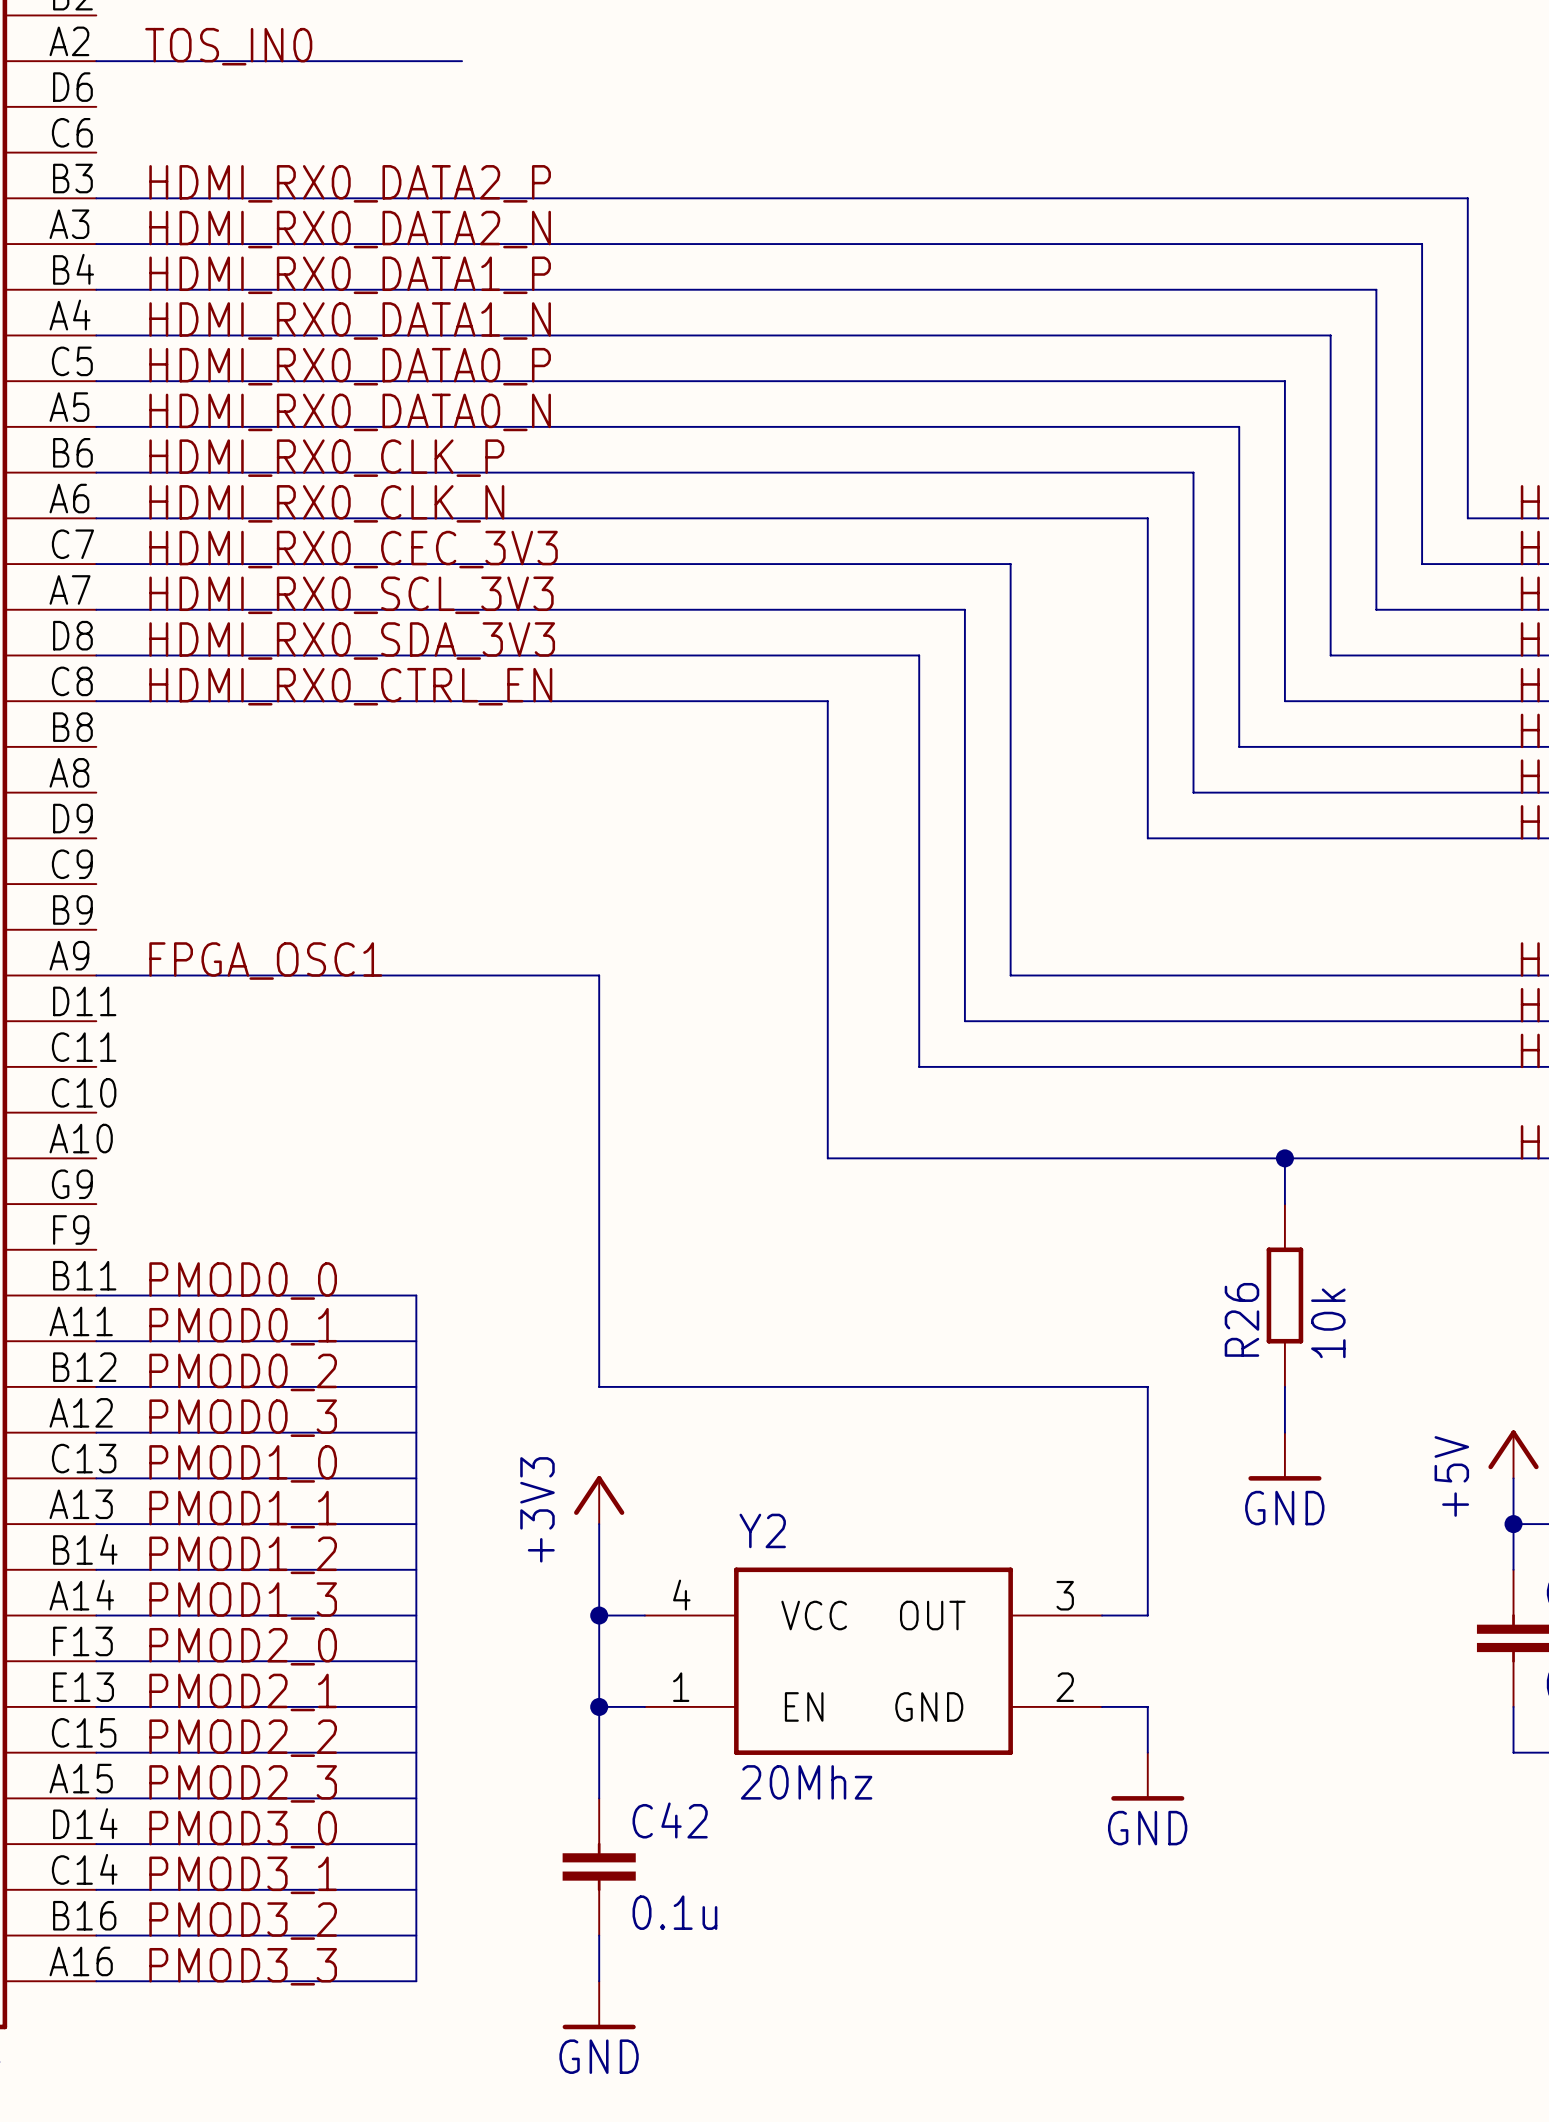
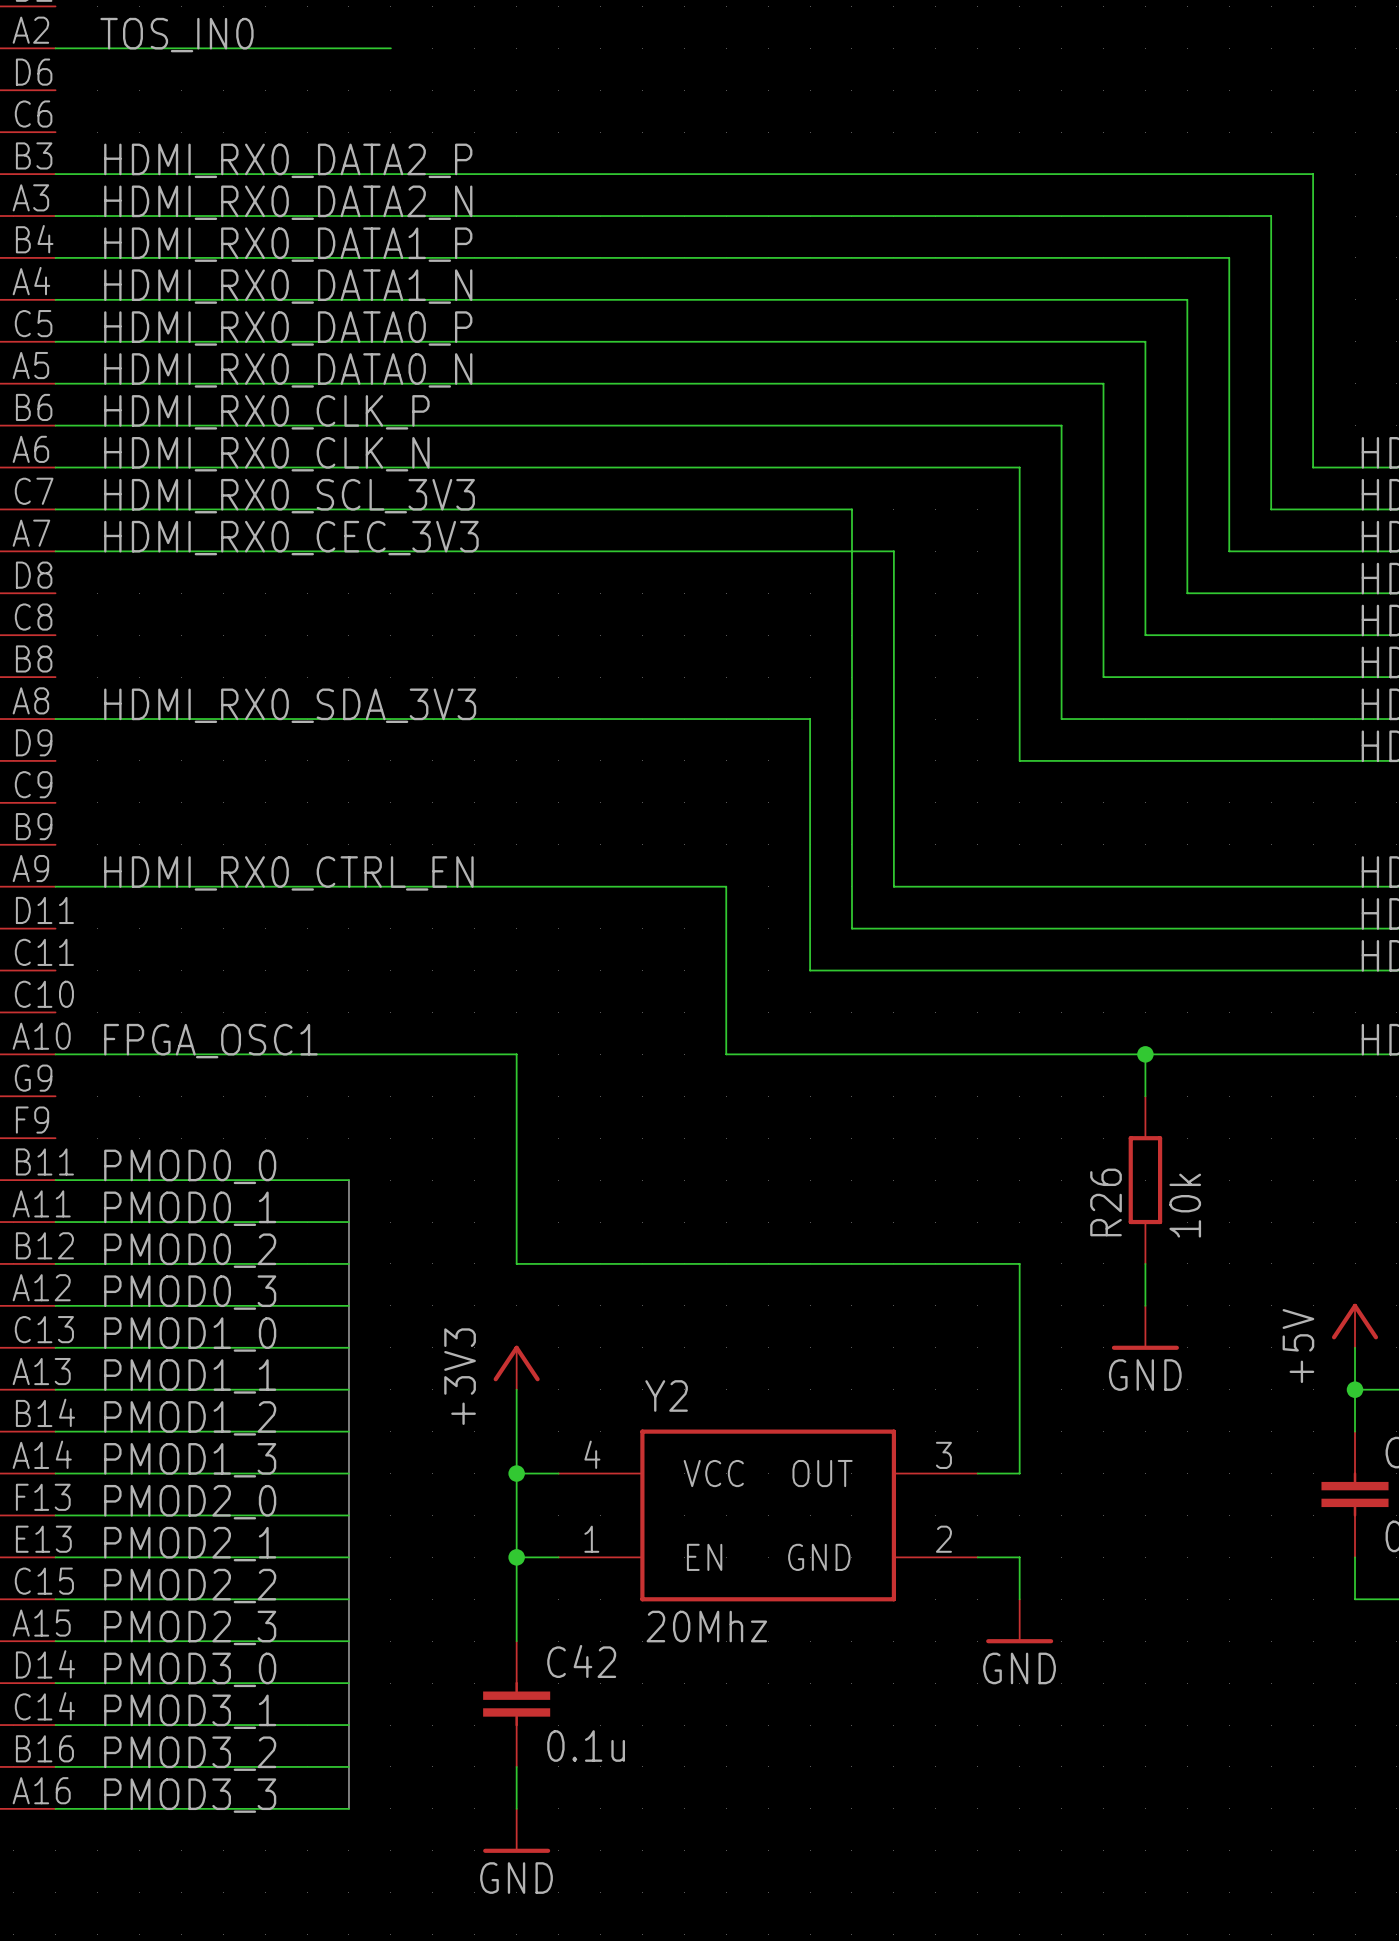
label: HDMI_RX0_CEC_3V3 (353, 549) -> HDMI_RX0_SCL_3V3 (289, 496)
wire: (964, 564) (1010, 564) (1010, 609) -> (851, 509) (851, 551) (893, 551)
label: HDMI_RX0_SCL_3V3 (351, 595) -> HDMI_RX0_CEC_3V3 (291, 538)
label position: HDMI_RX0_SDA_3V3 (352, 641) -> HDMI_RX0_SDA_3V3 (290, 705)
wire: (96, 655) (919, 655) (919, 792) -> (55, 719) (810, 719)
label: HDMI_RX0_CTRL_EN (350, 686) -> none
wire: (96, 701) (827, 701) (827, 975) -> none
label: FPGA_OSC1 (265, 961) -> HDMI_RX0_CTRL_EN (288, 873)
wire: (599, 975) (599, 1158) -> (516, 886) (726, 886)
label: none -> FPGA_OSC1 (210, 1041)
wire: none -> (55, 1054) (516, 1054)

